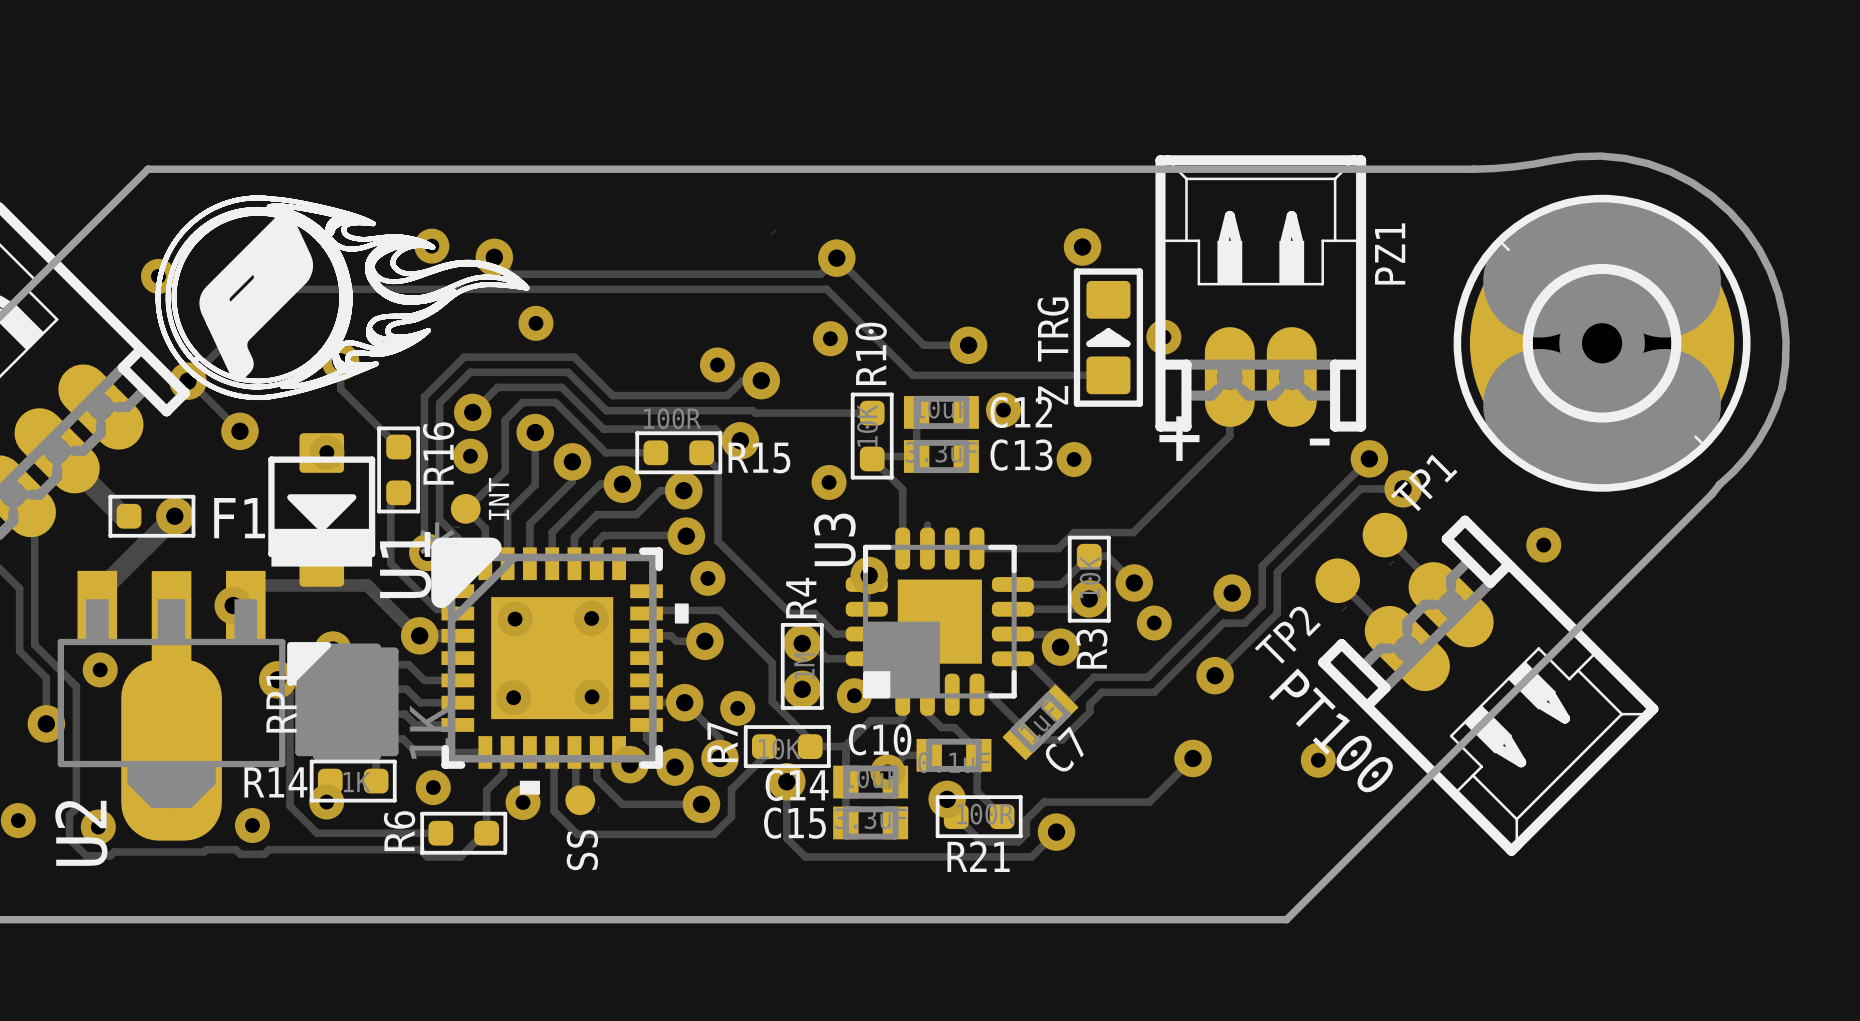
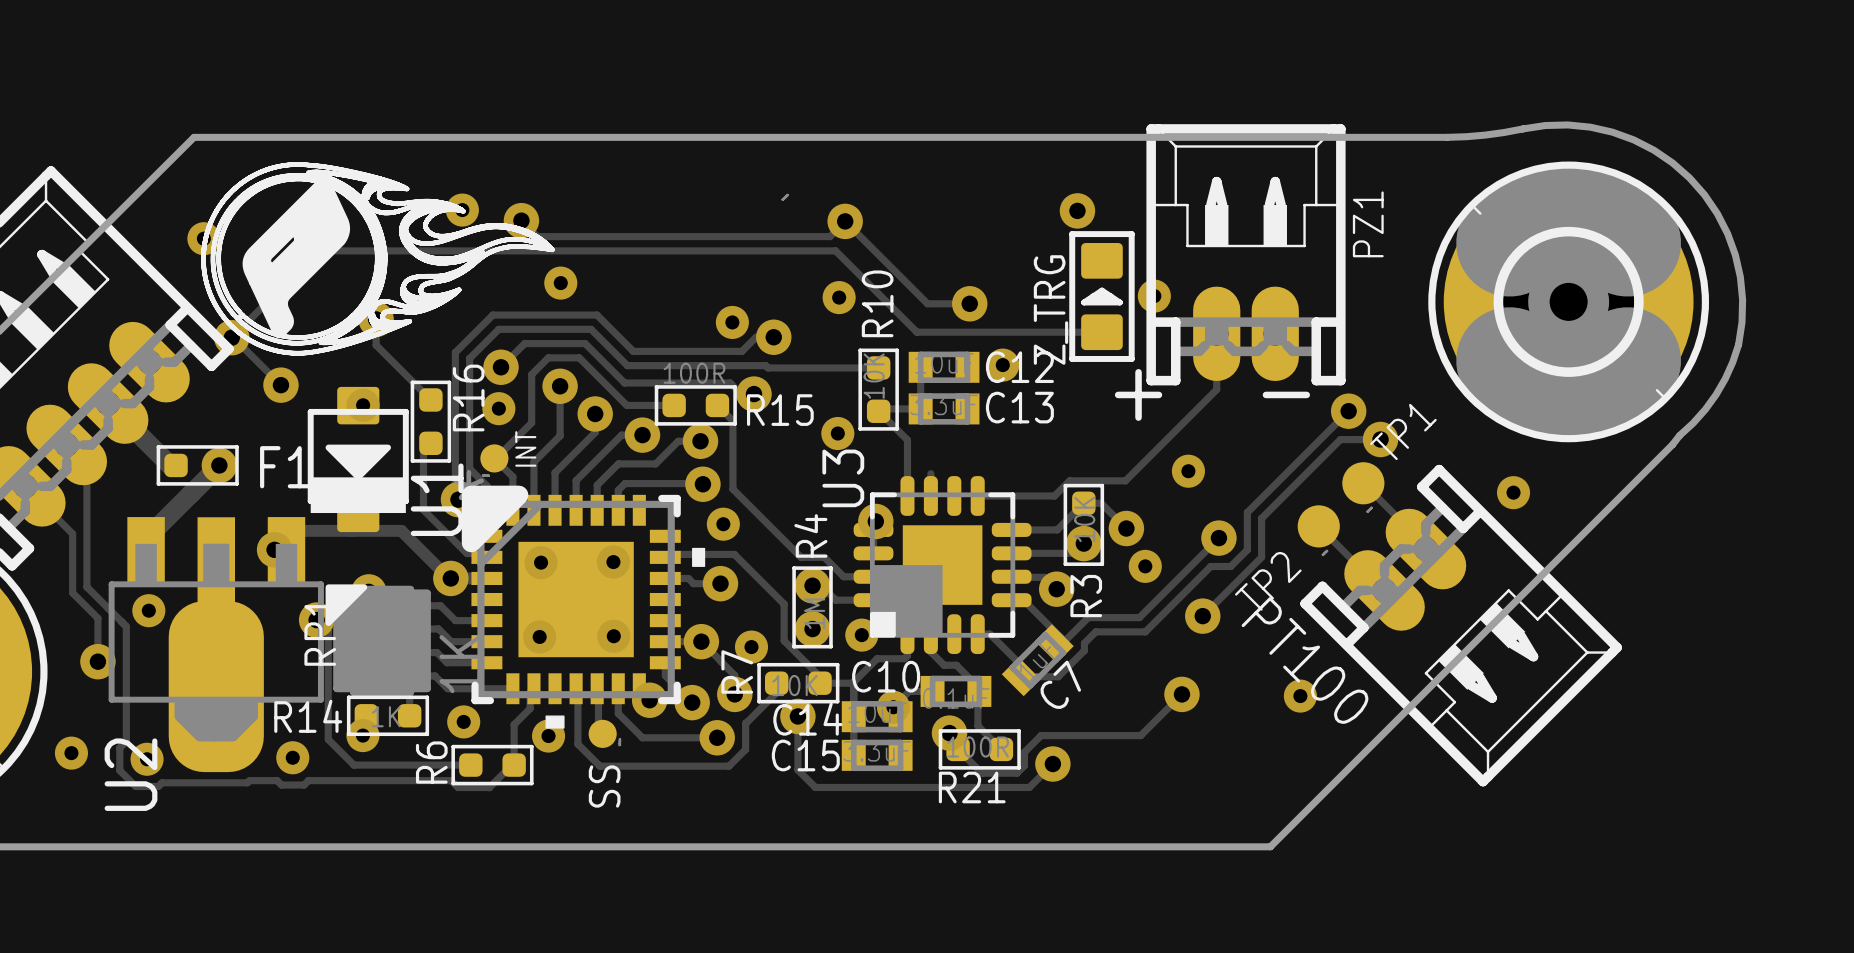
via position: (1074, 459) -> (1188, 471)

